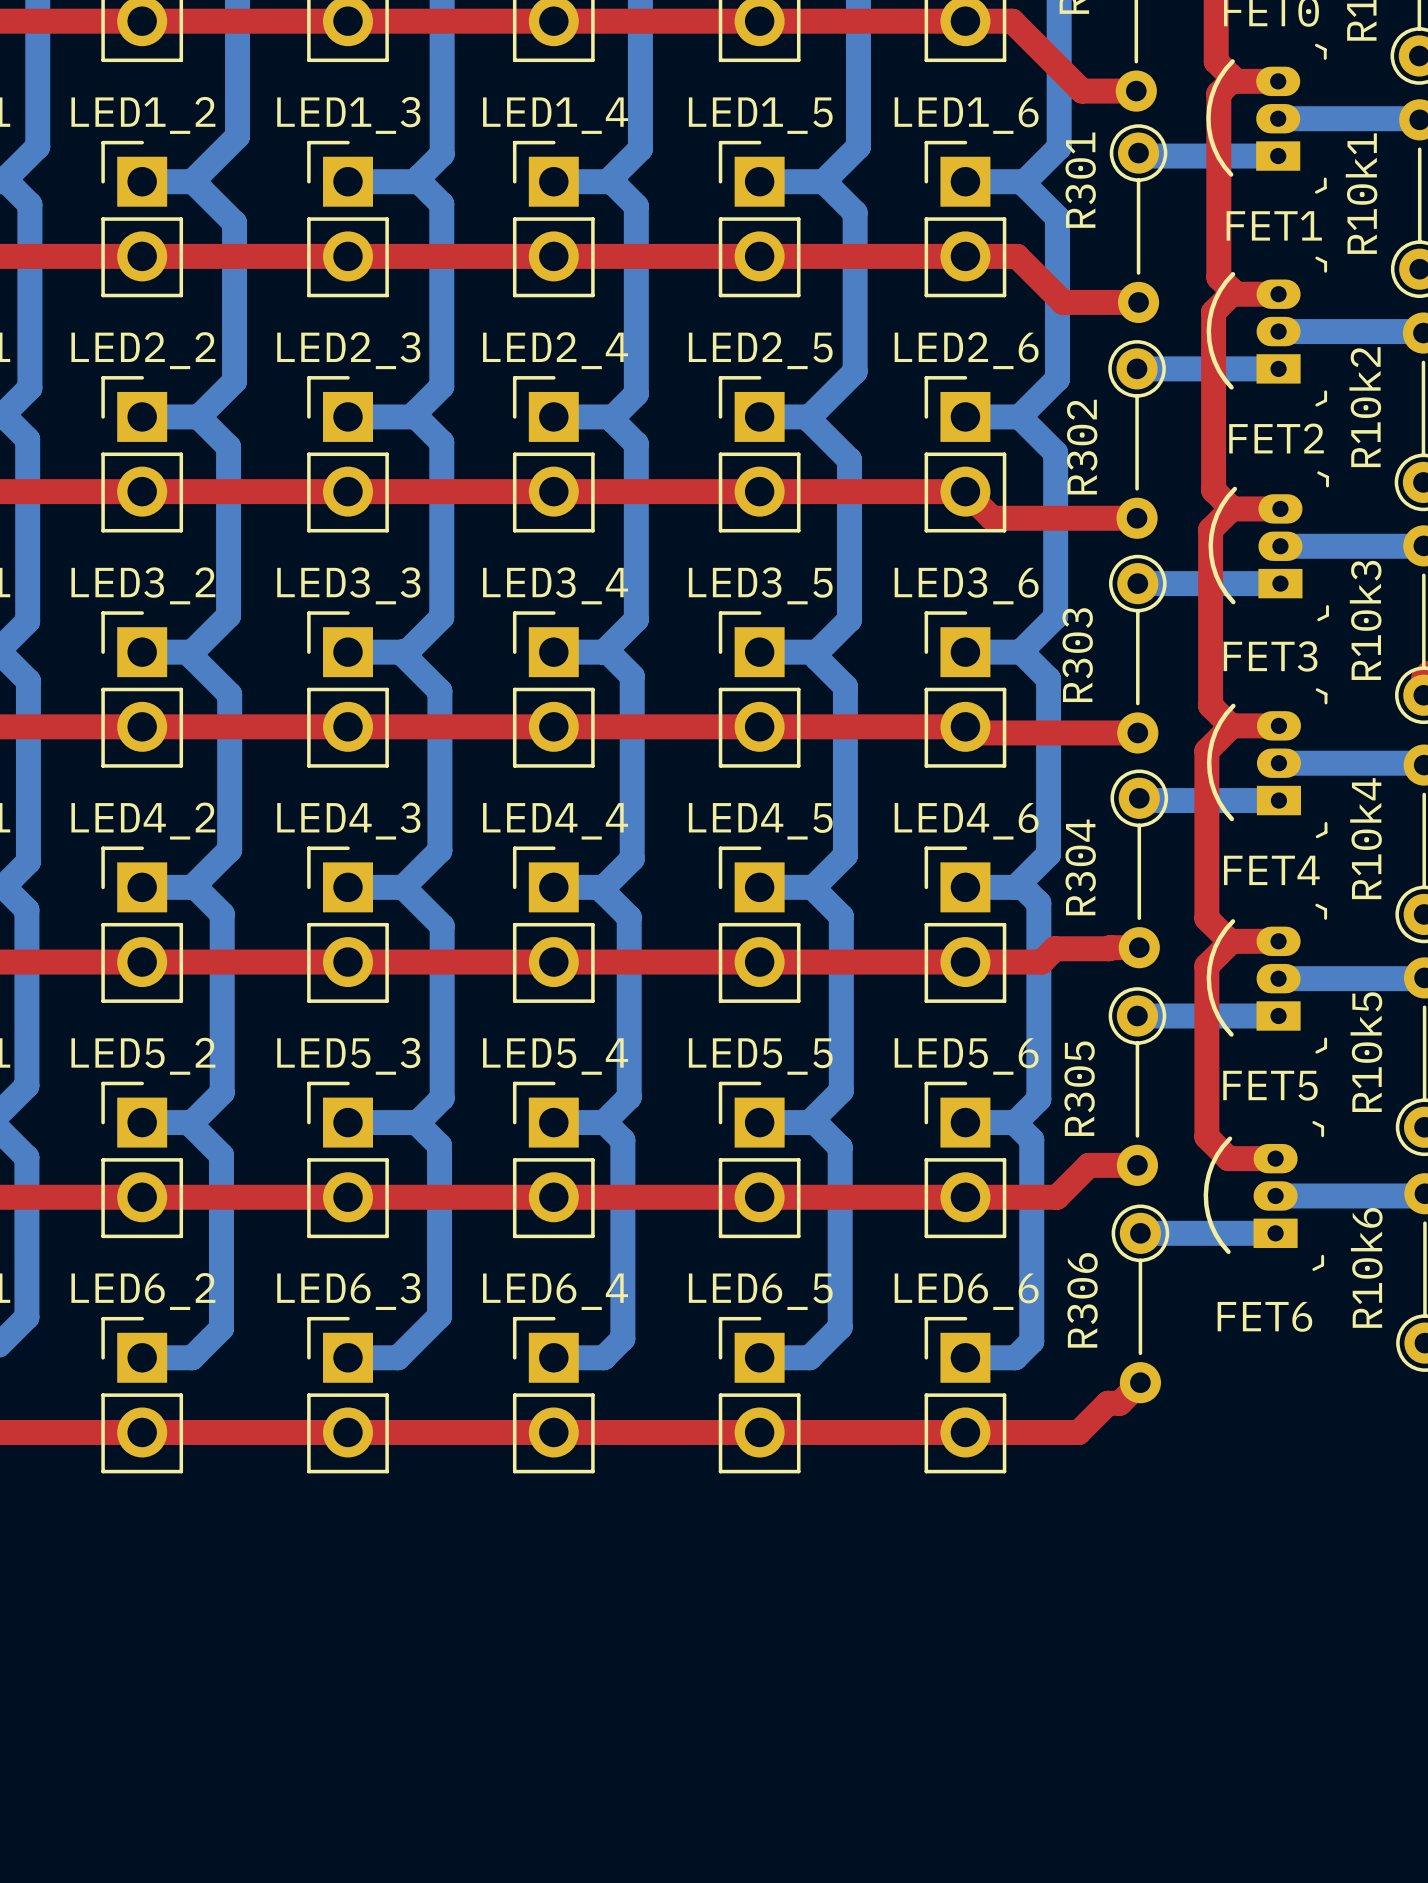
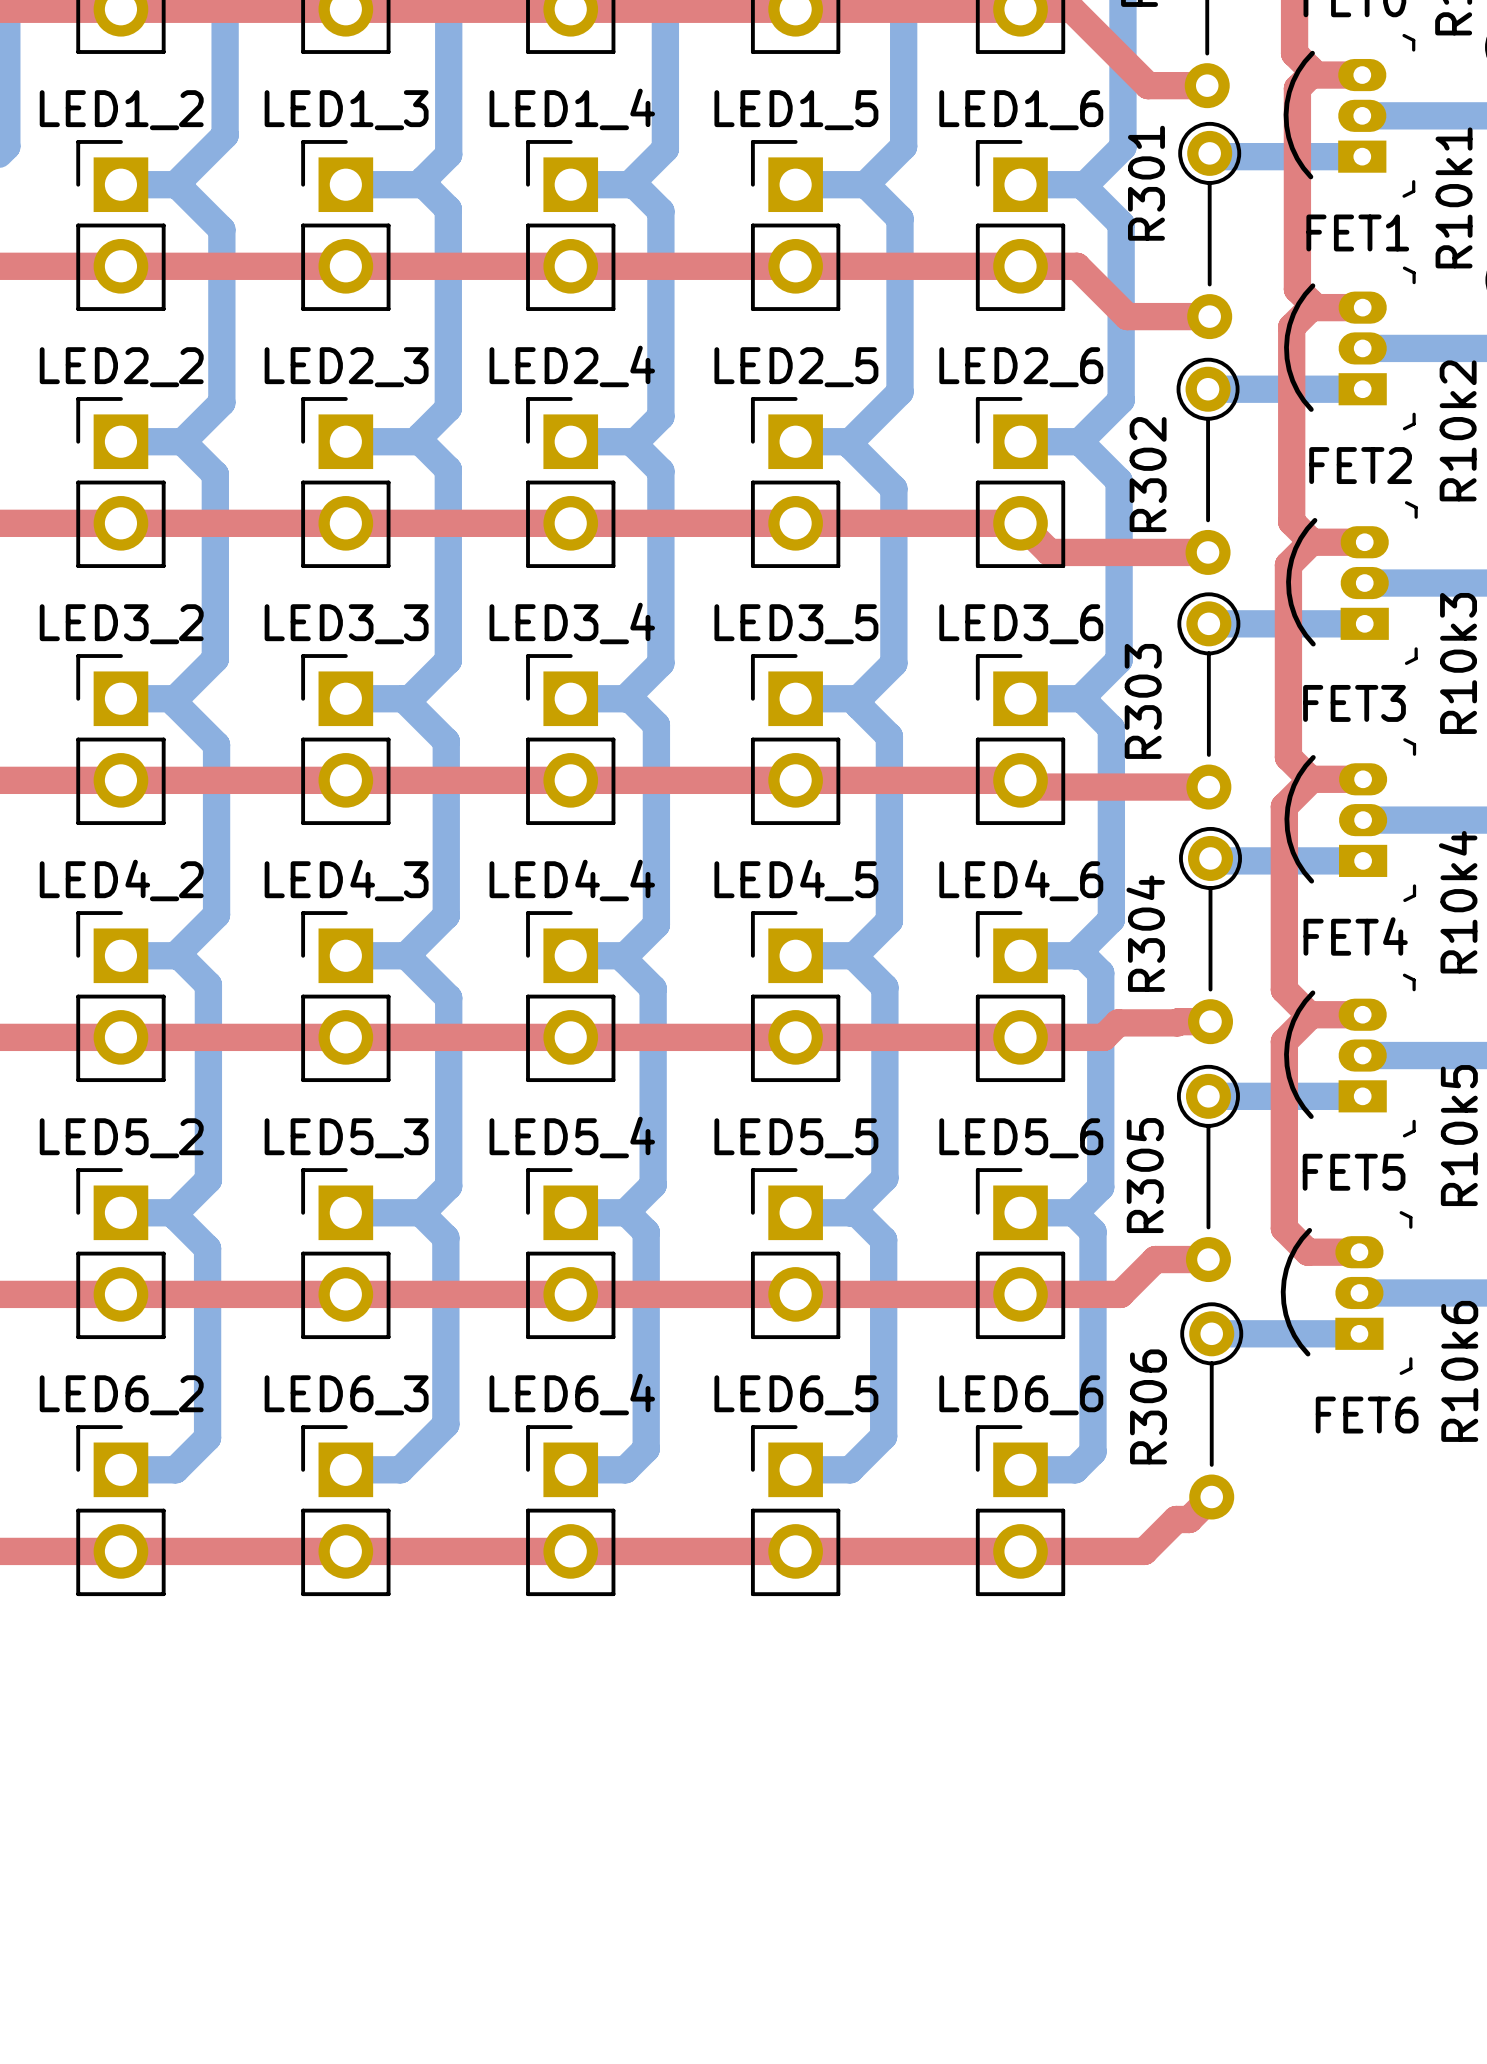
FET6 name position: FET6 (1264, 1316) -> FET6 (1367, 1415)

